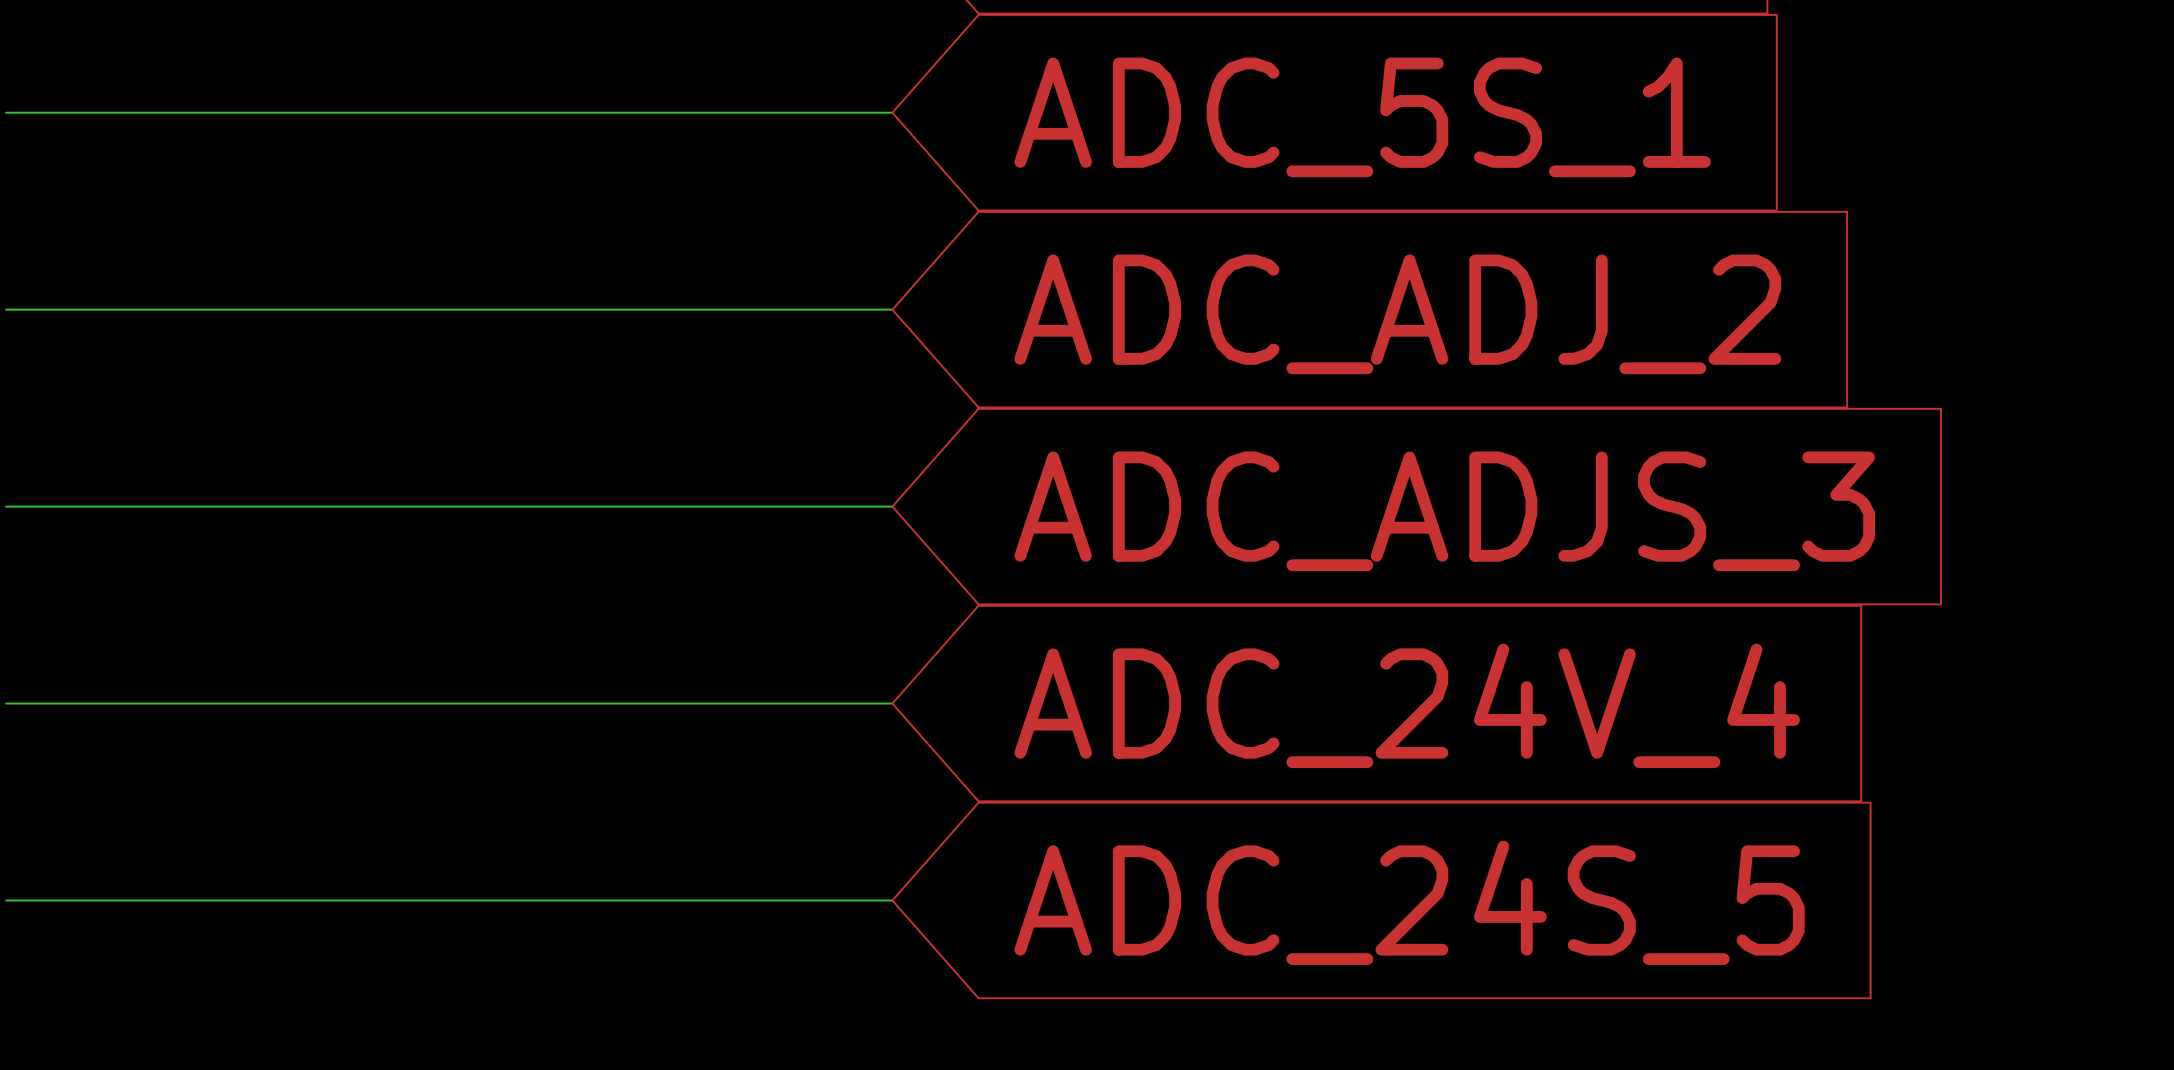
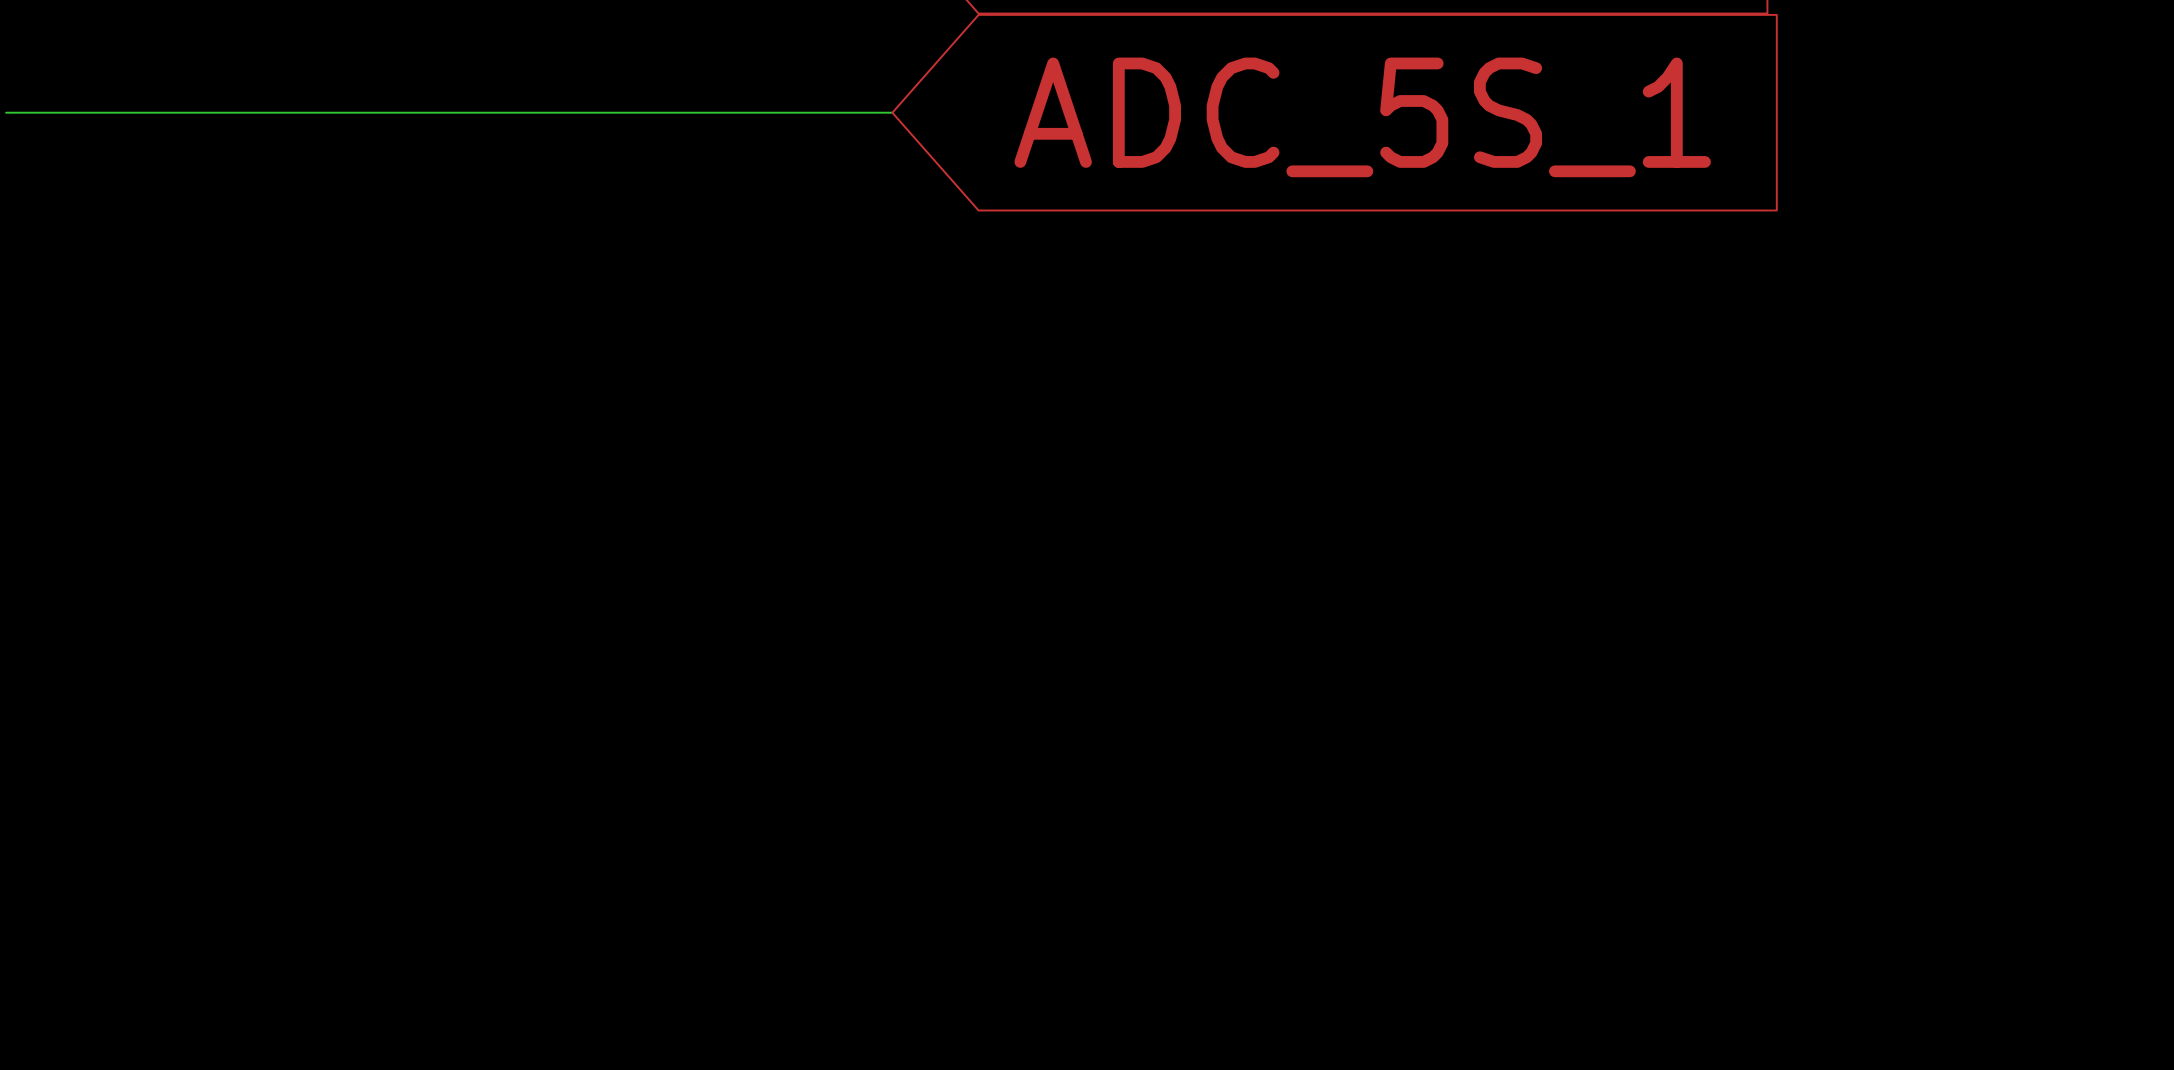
wire: (6, 309) (892, 309) -> none
global label: ADC_ADJ_2 (1397, 314) -> none
wire: (6, 506) (892, 506) -> none
global label: ADC_ADJS_3 (1444, 511) -> none
wire: (6, 703) (892, 703) -> none
global label: ADC_24V_4 (1407, 705) -> none
wire: (6, 900) (892, 900) -> none
global label: ADC_24S_5 (1409, 902) -> none

